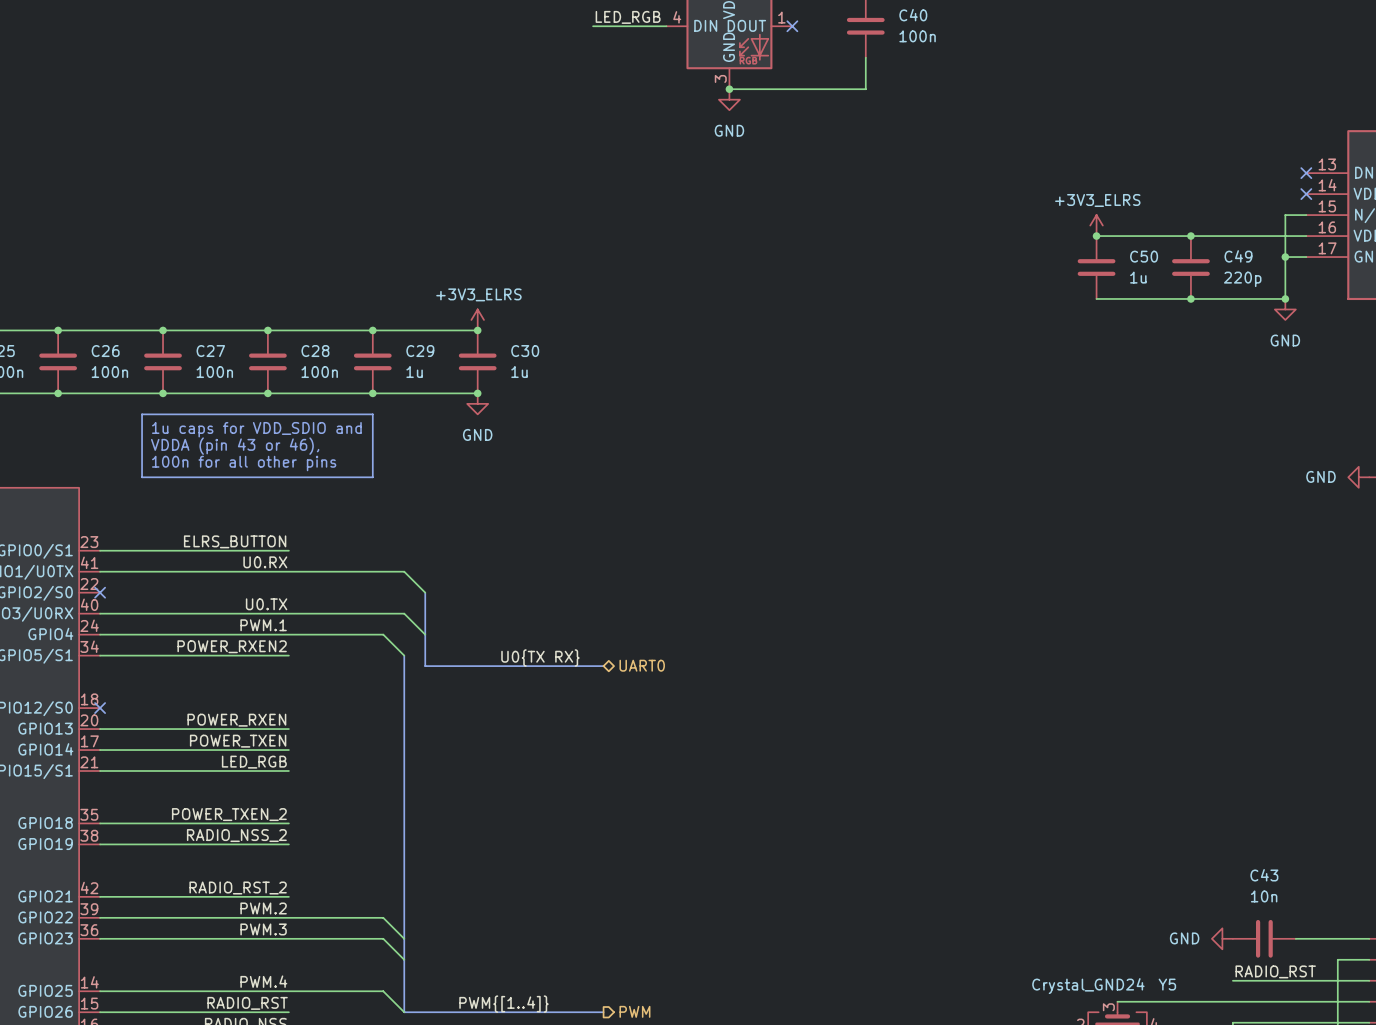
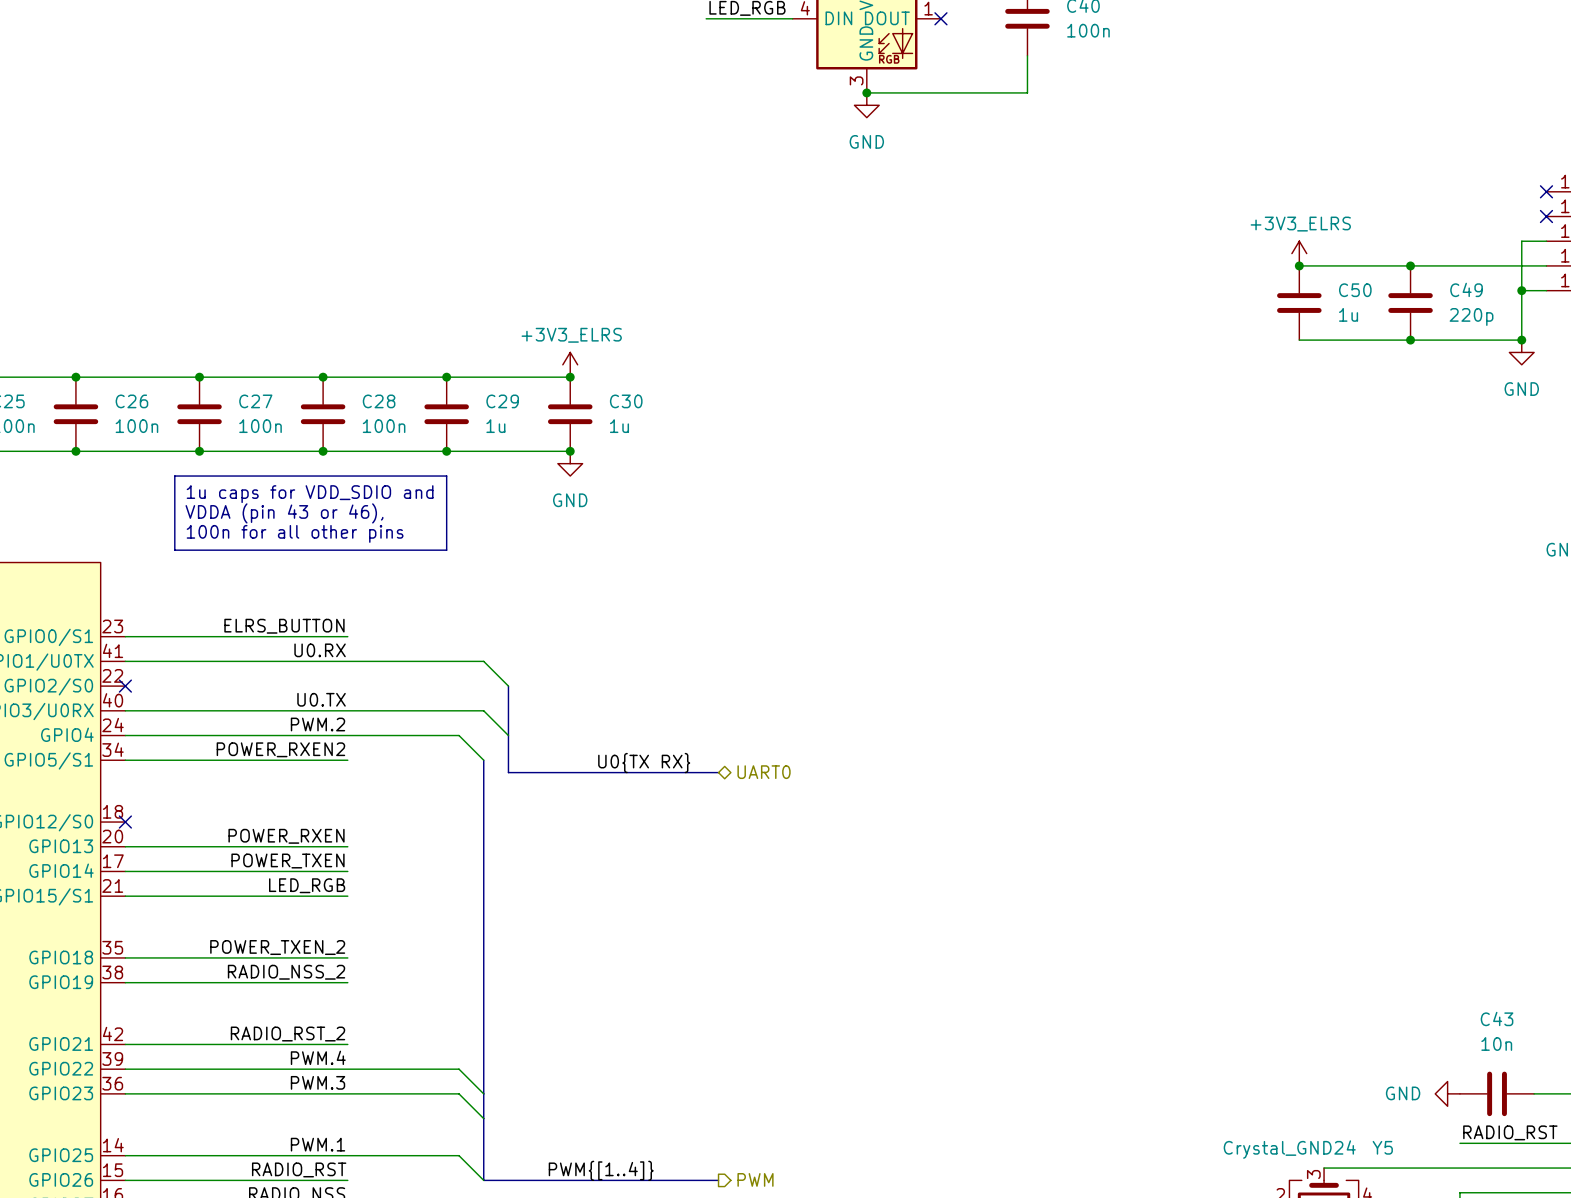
label: PWM.1 (263, 625) -> PWM.2 (318, 724)
label: PWM.2 (263, 908) -> PWM.4 (318, 1057)
label: PWM.4 (263, 981) -> PWM.1 (318, 1144)

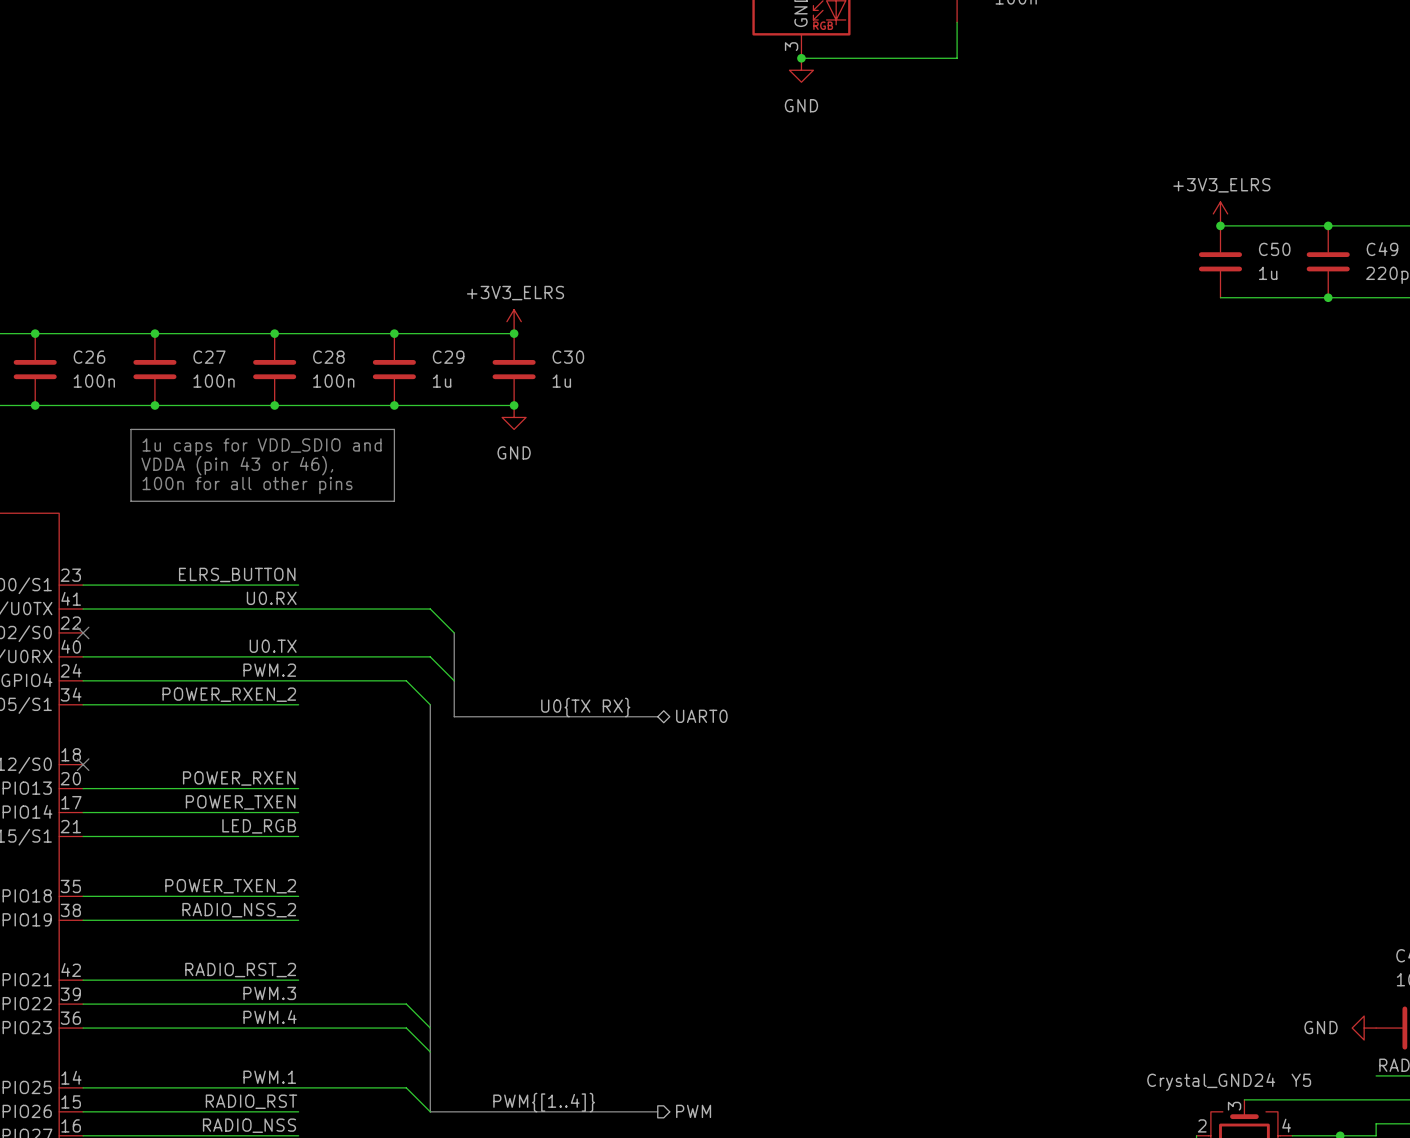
label: POWER_RXEN2 (280, 749) -> POWER_RXEN_2 (229, 694)
label: PWM.4 (318, 1057) -> PWM.3 (269, 993)
label: PWM.3 (318, 1082) -> PWM.4 (270, 1017)

